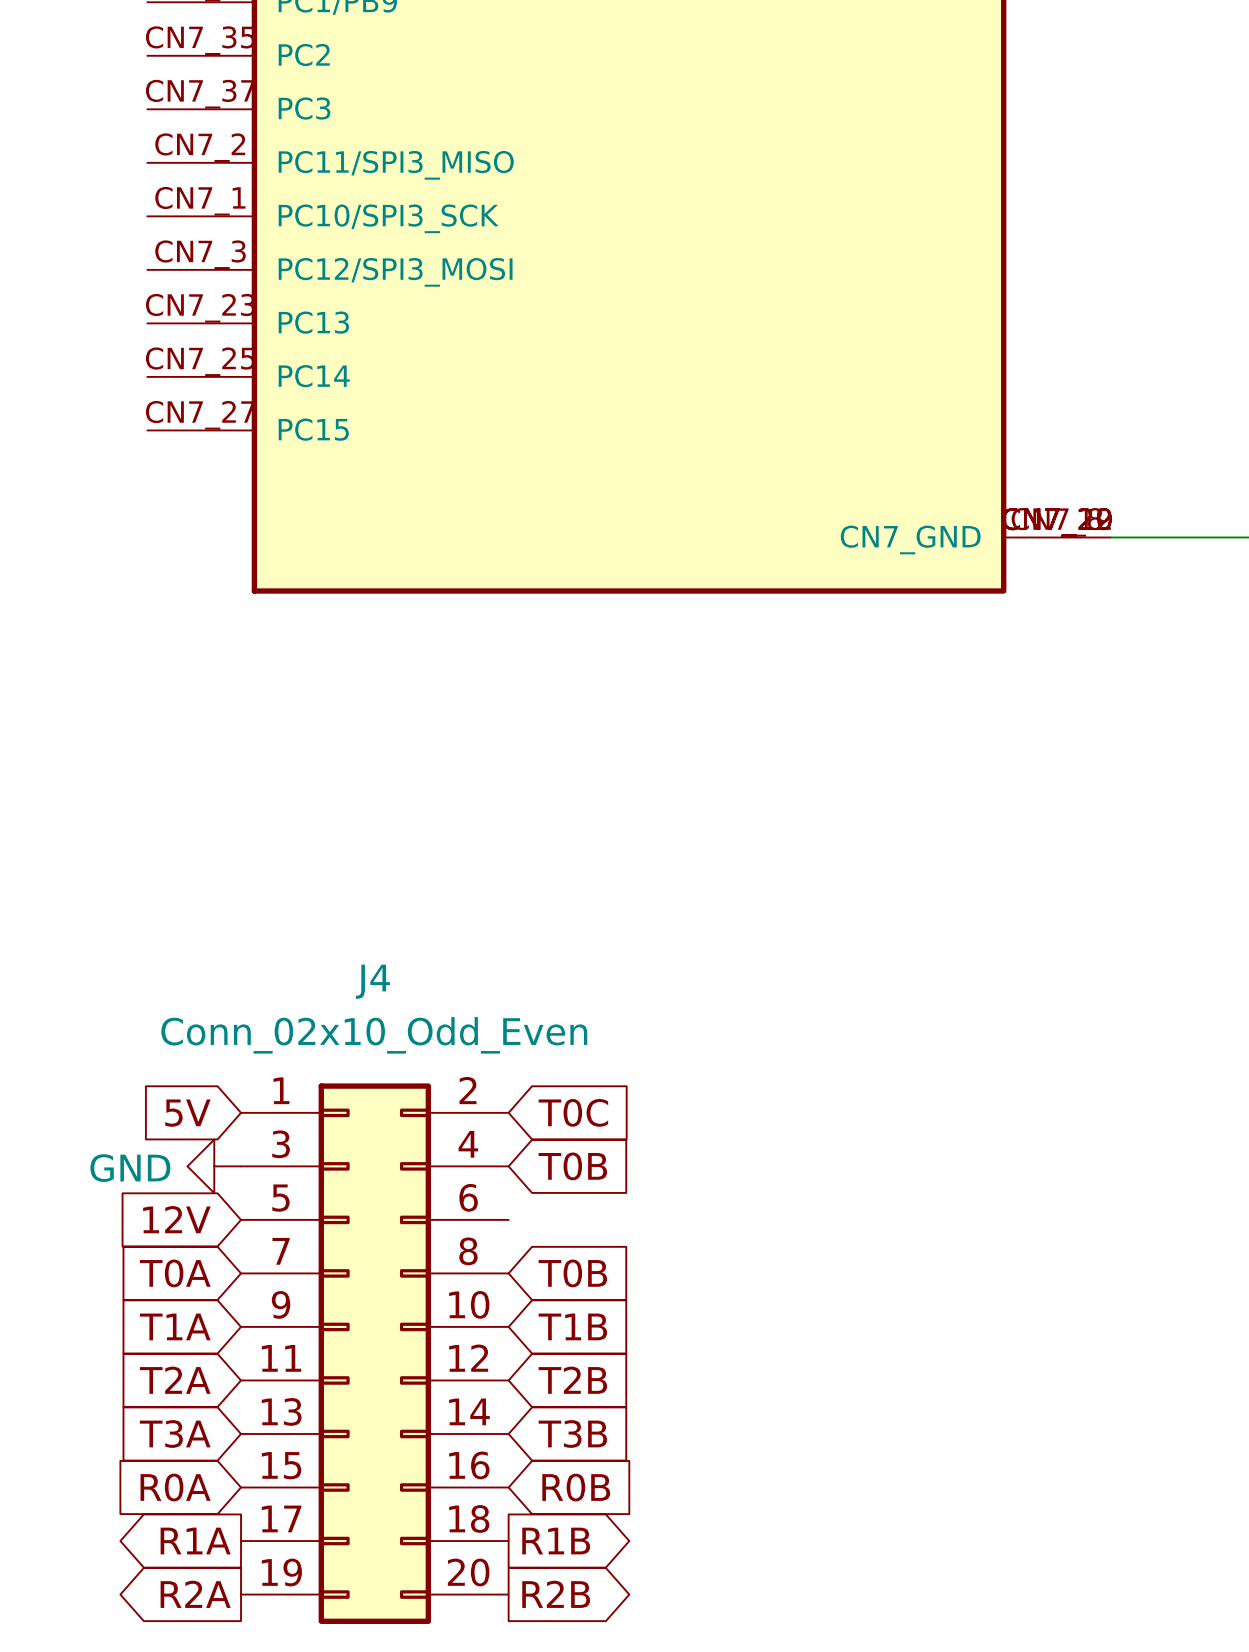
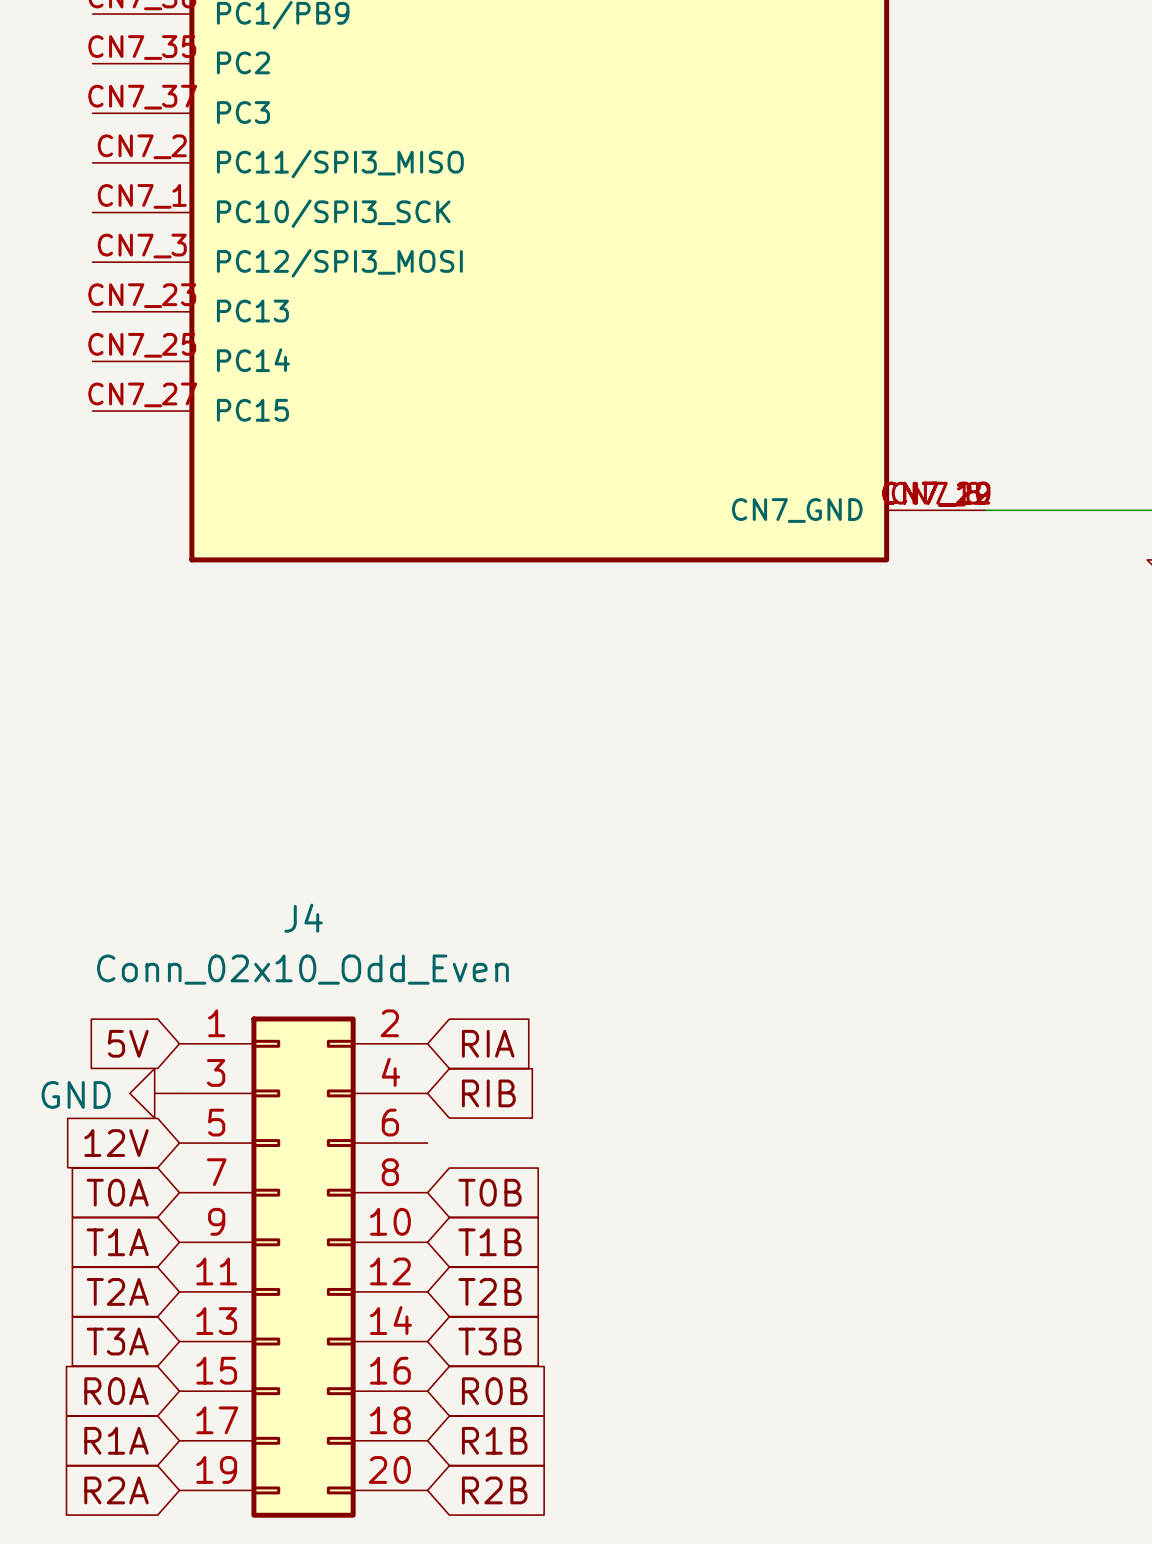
global label: T0C (573, 1112) -> RIA (488, 1043)
global label: T0B (572, 1166) -> RIB (488, 1093)
global label shape: output (195, 1541) -> input (116, 1440)
global label shape: output (556, 1541) -> input (494, 1440)
global label shape: output (195, 1594) -> input (116, 1490)
global label shape: output (556, 1594) -> input (494, 1490)

